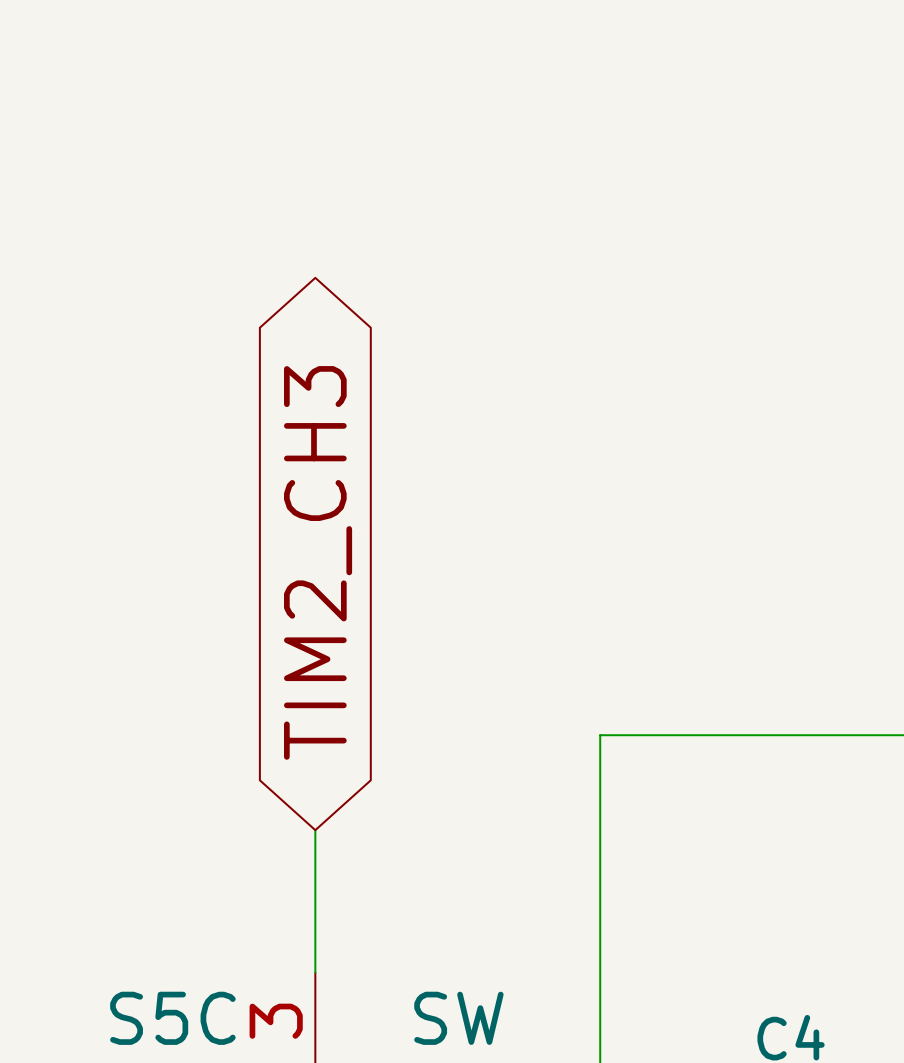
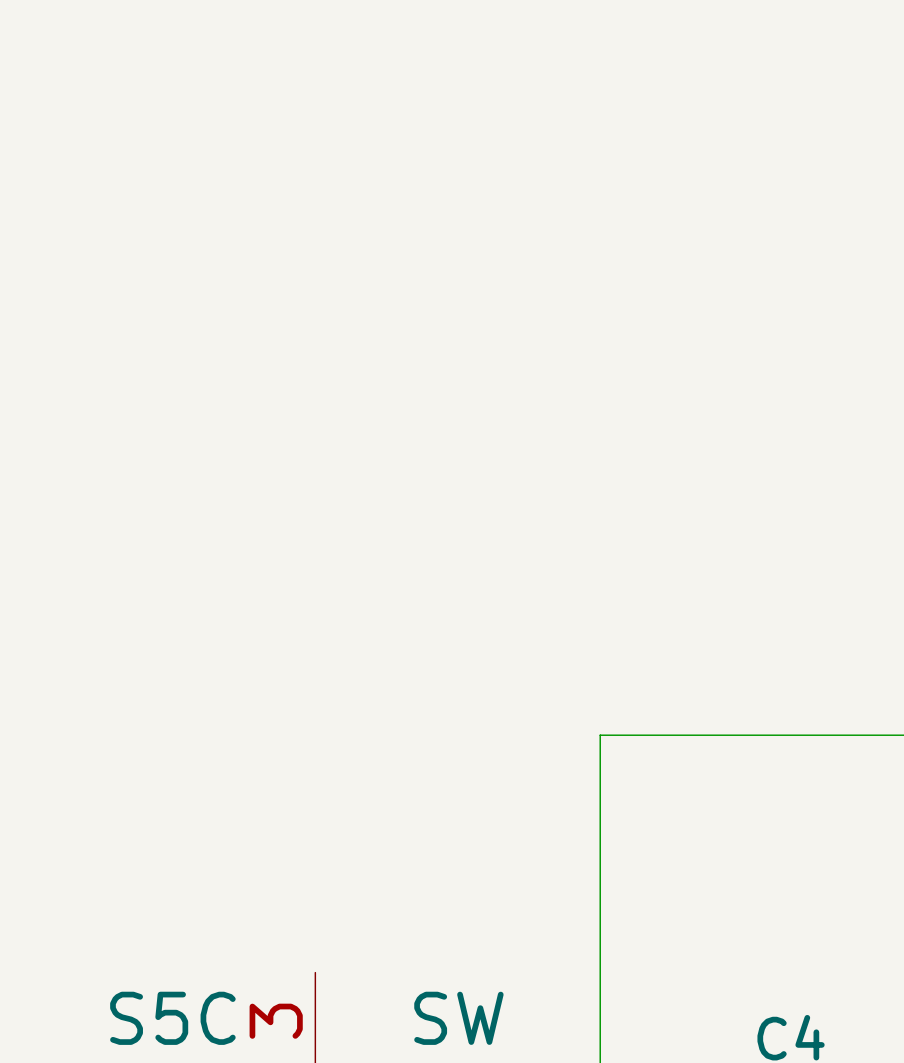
global label: TIM2_CH3 (318, 562) -> none
wire: (315, 830) (315, 972) -> none

